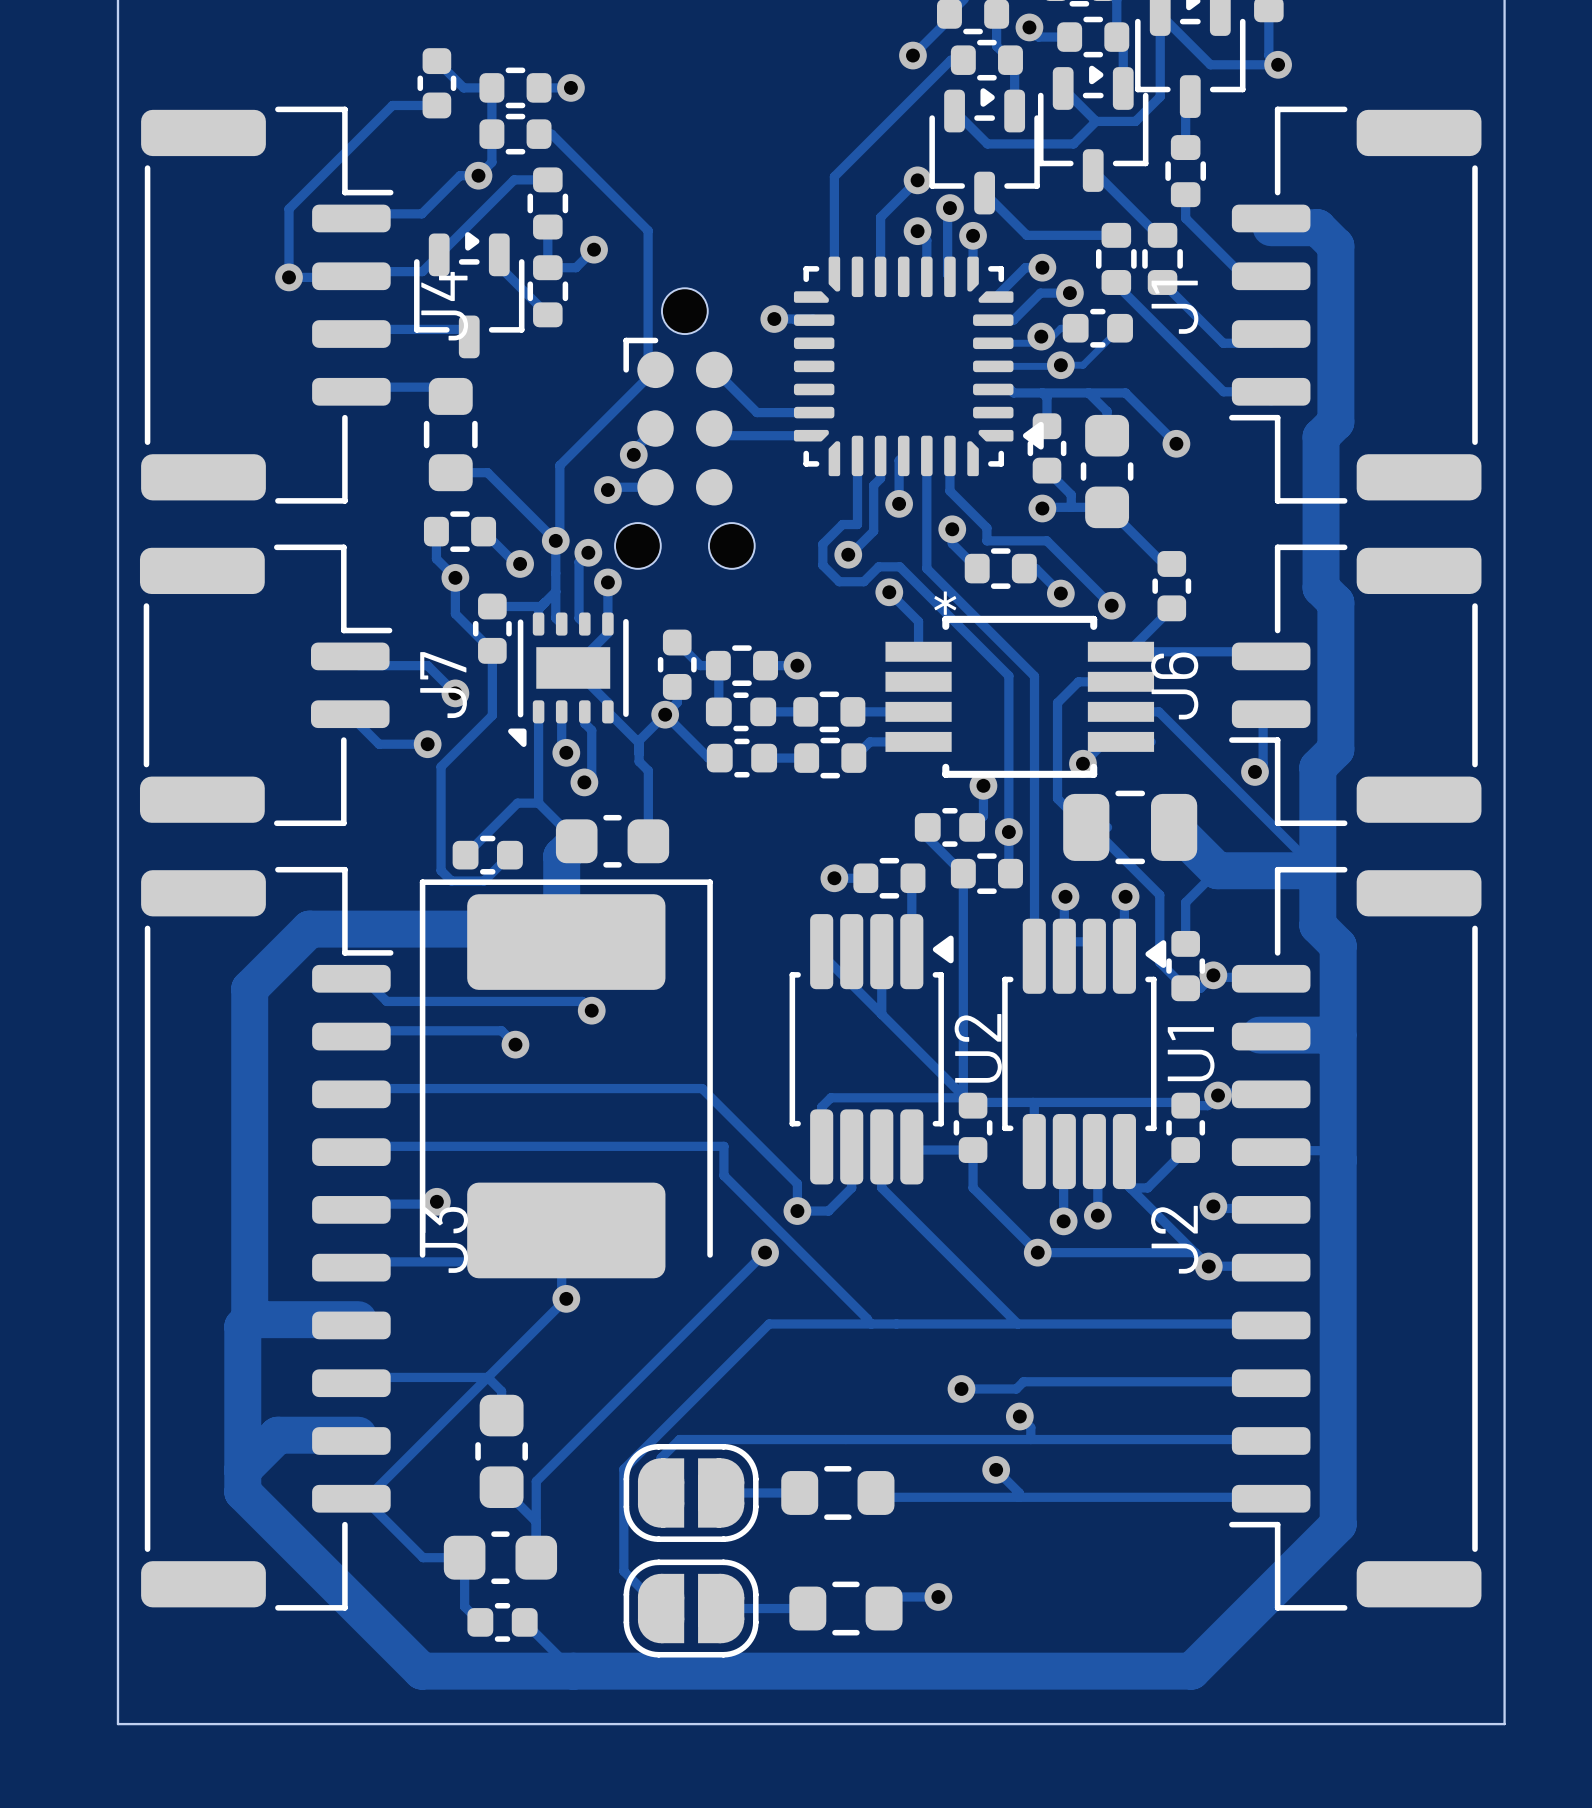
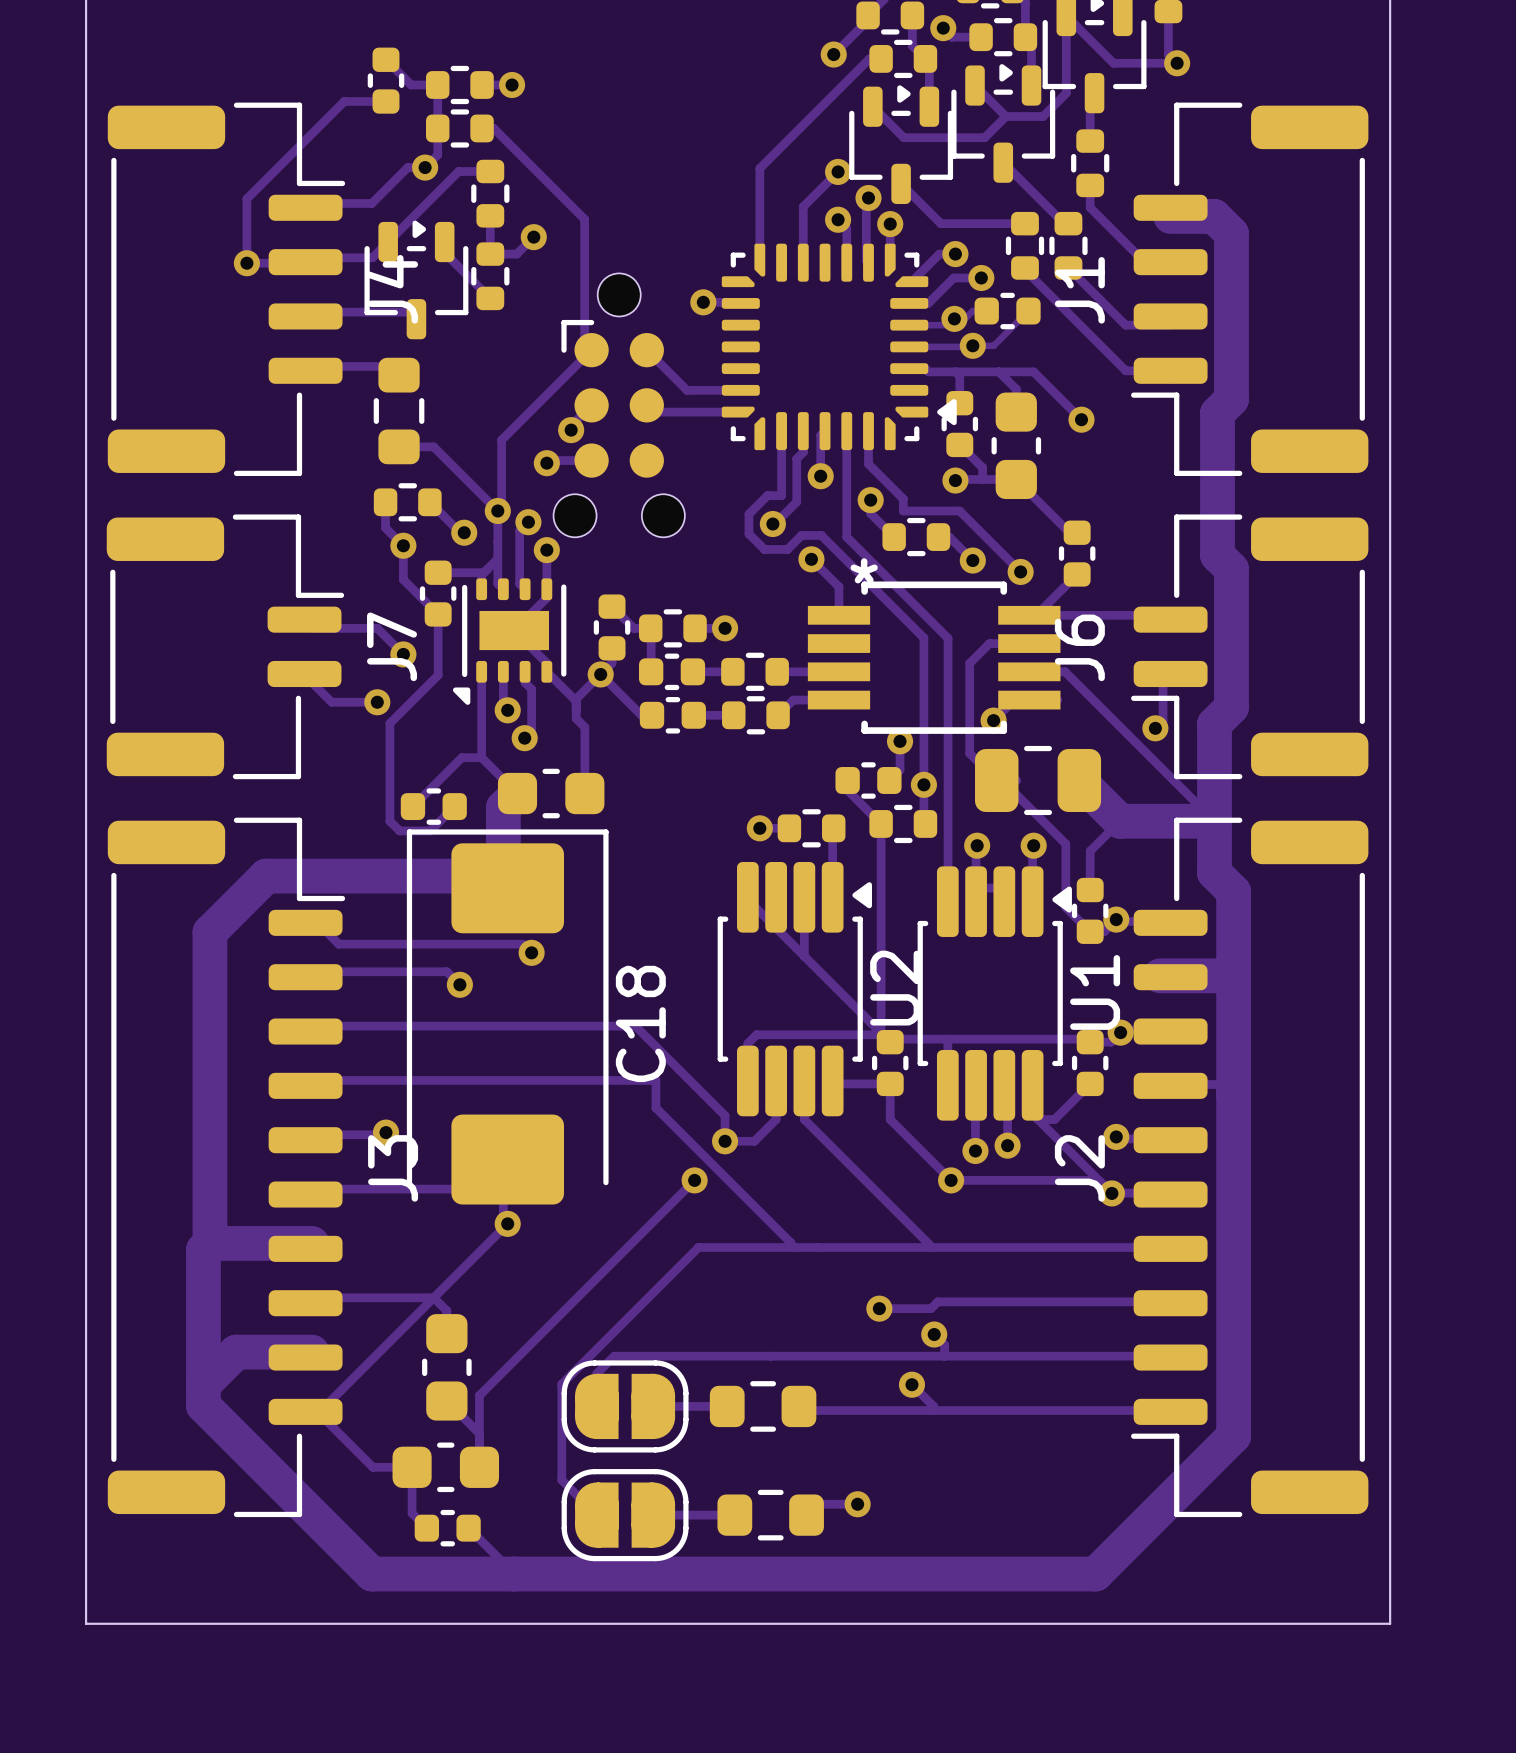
part: (566, 1078) -> none
C18: none -> (507, 1016)

